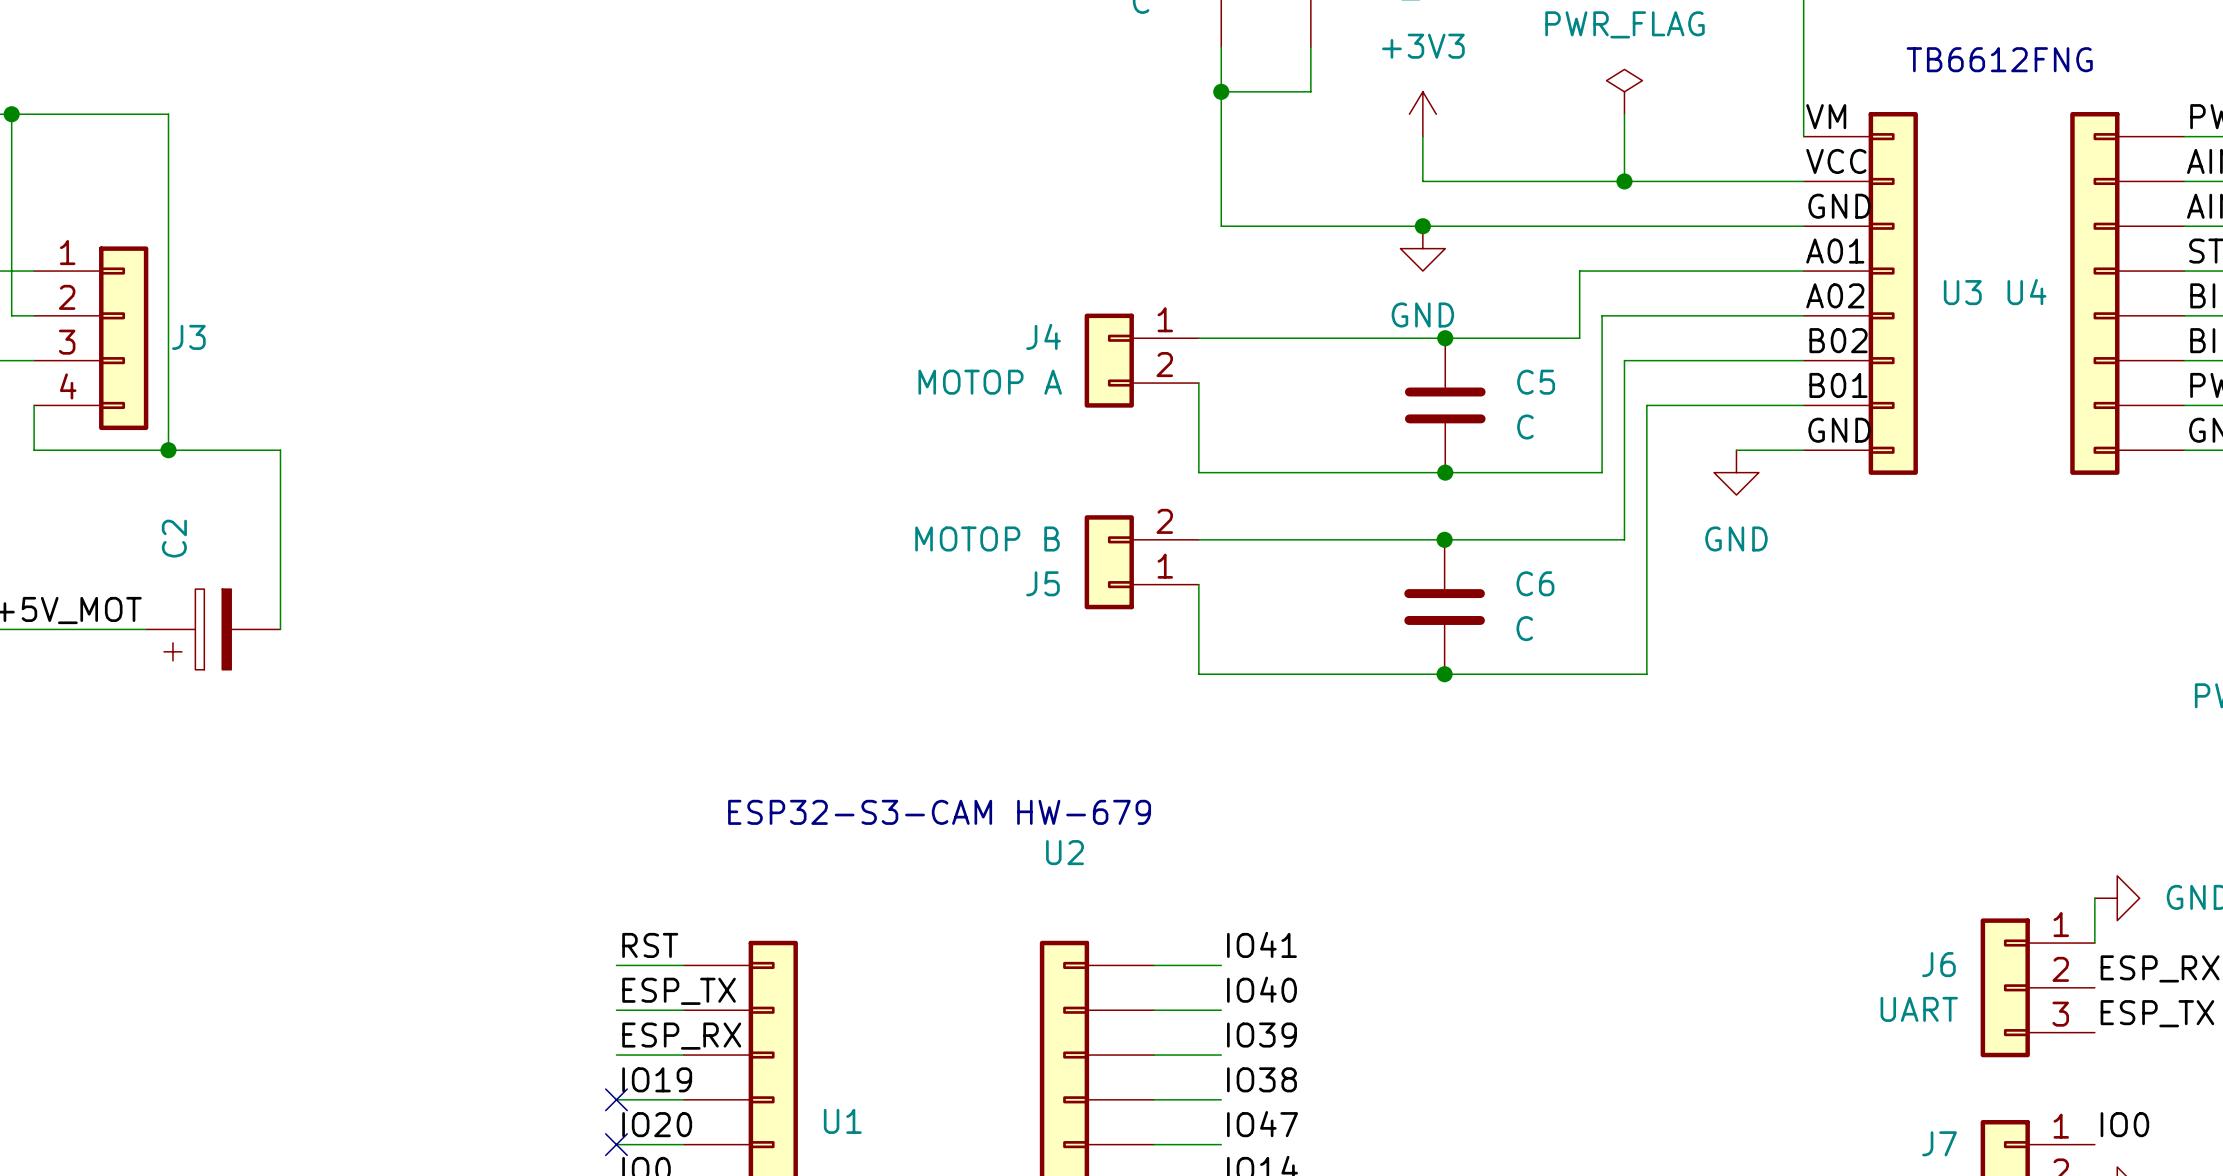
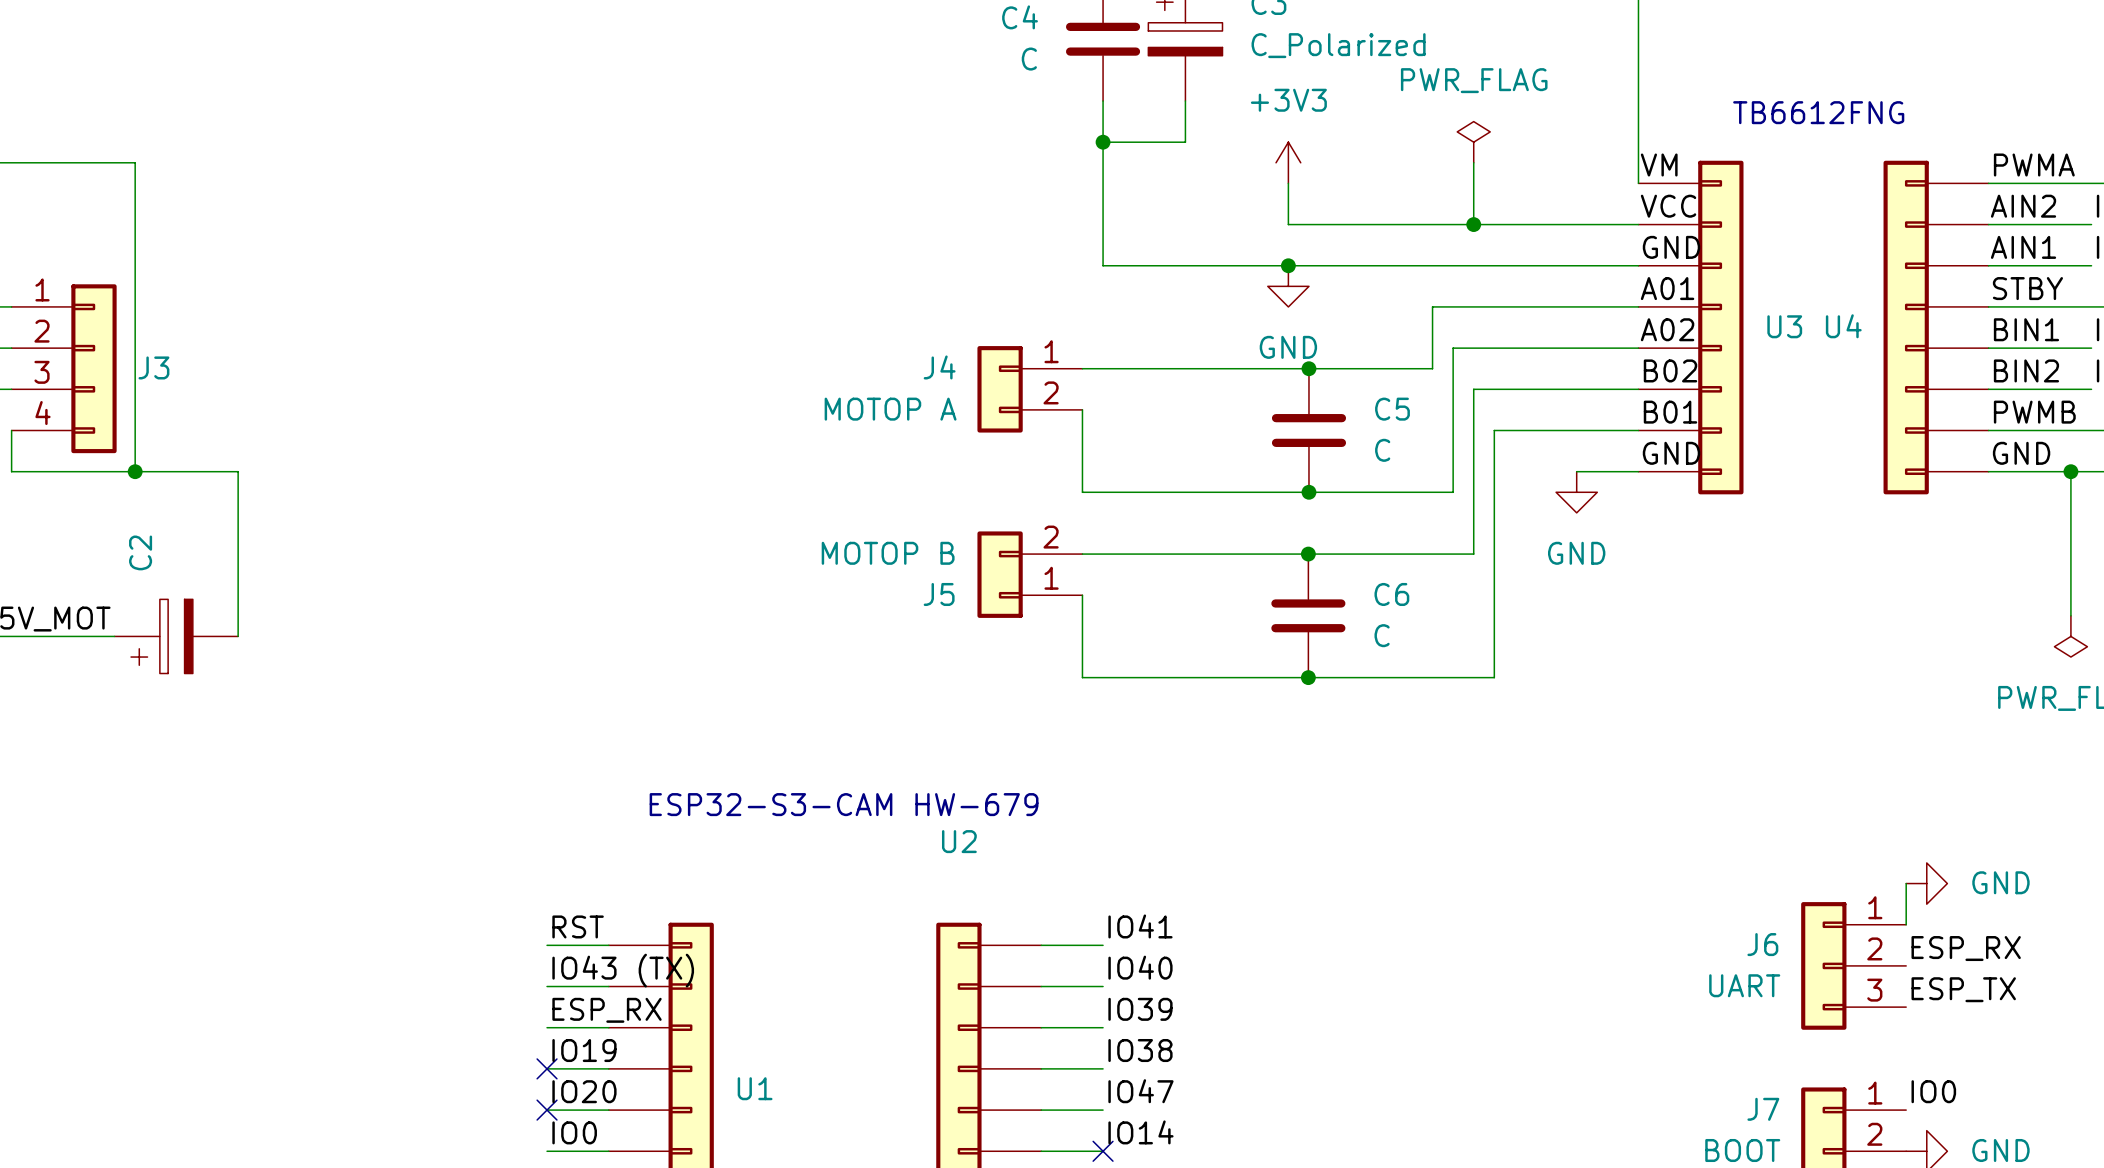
label: ESP_TX (679, 991) -> IO43 (TX) (623, 970)

